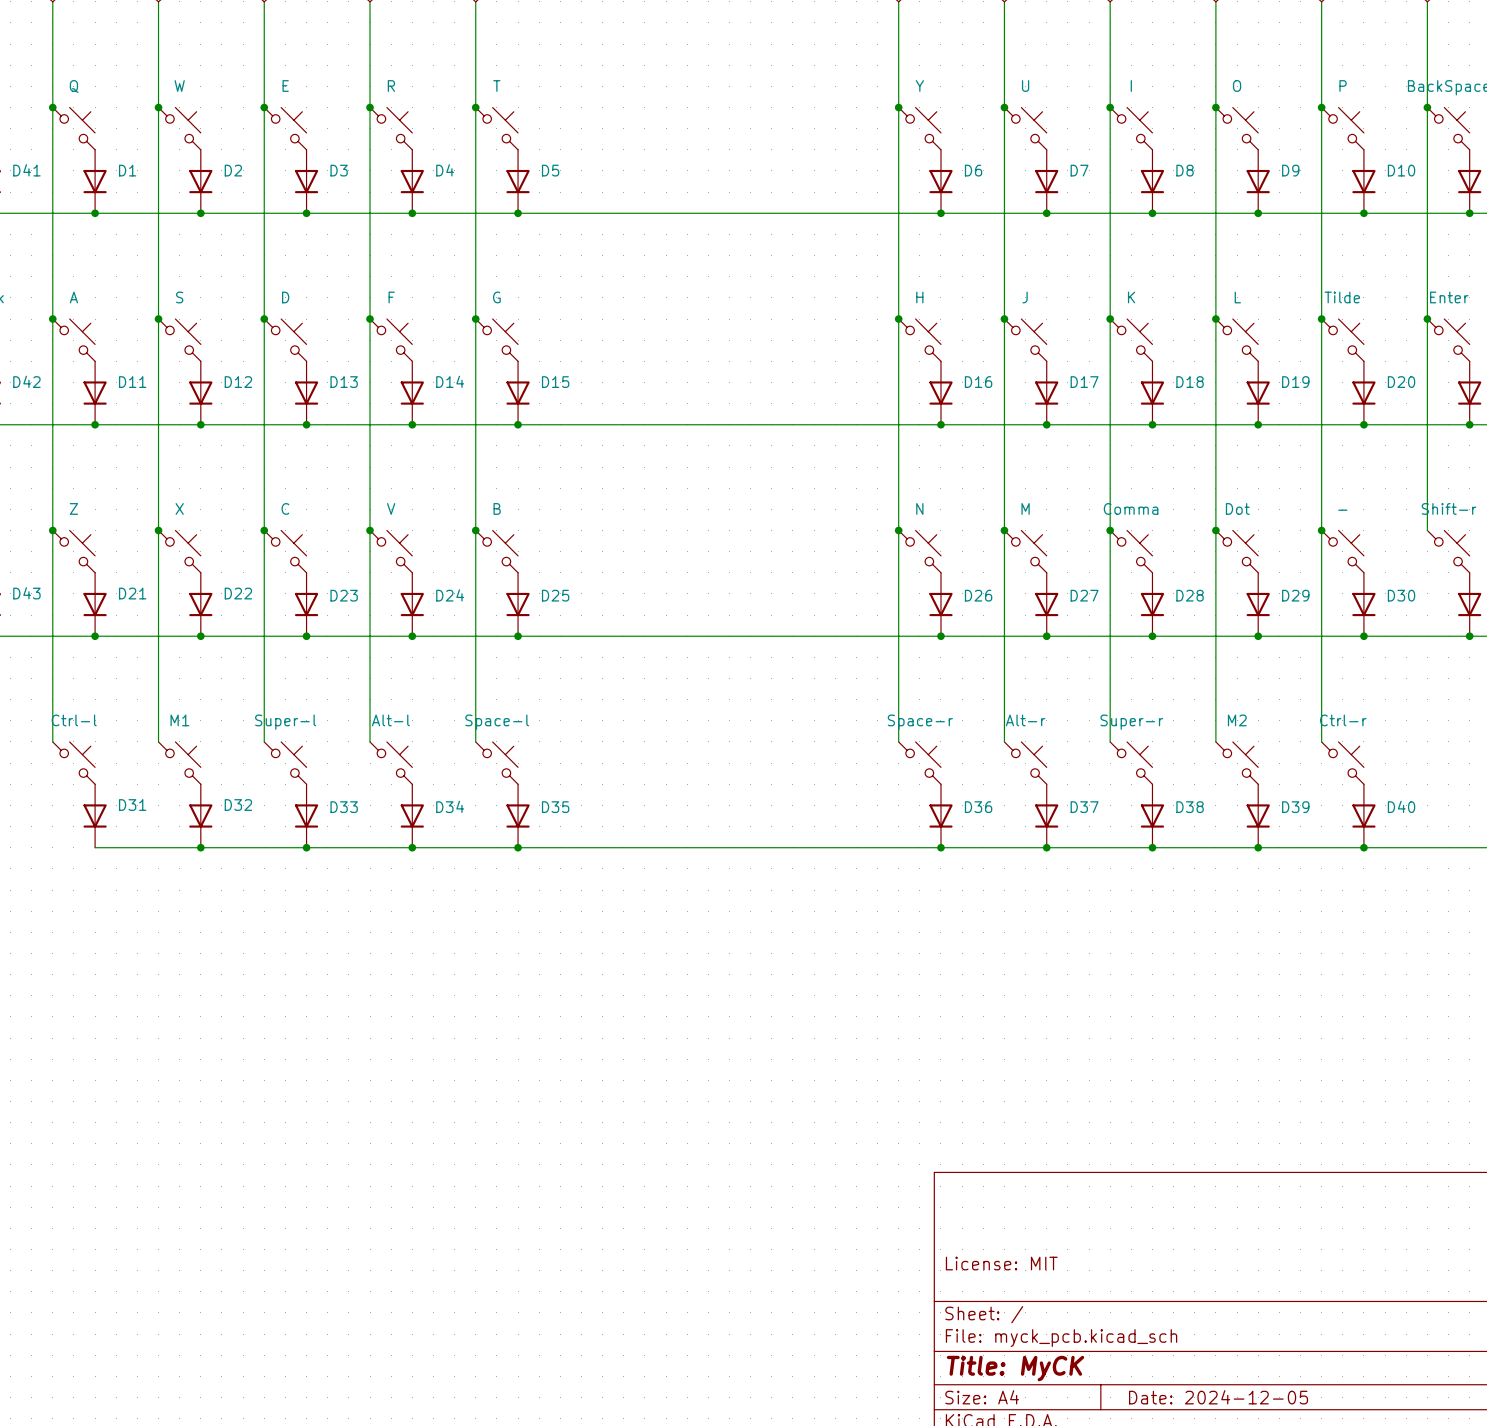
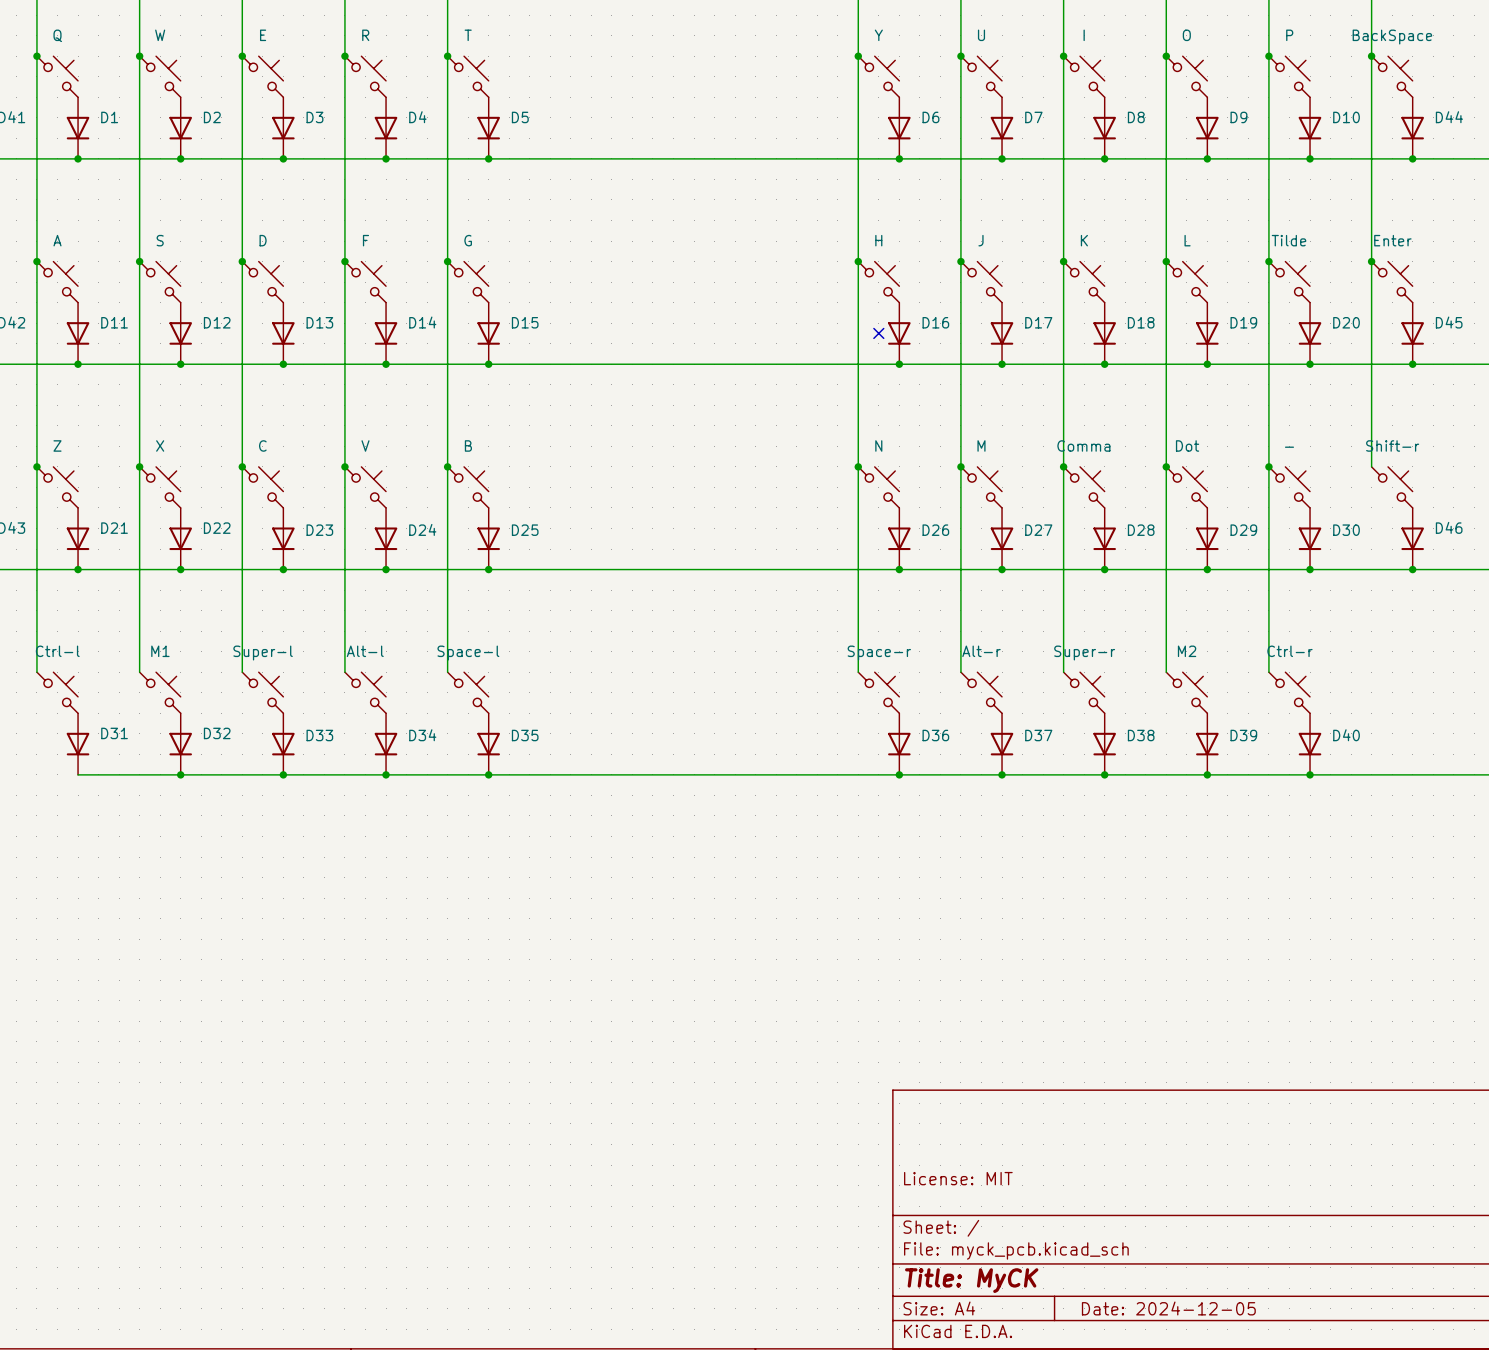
no-connect mark: none -> (878, 333)

